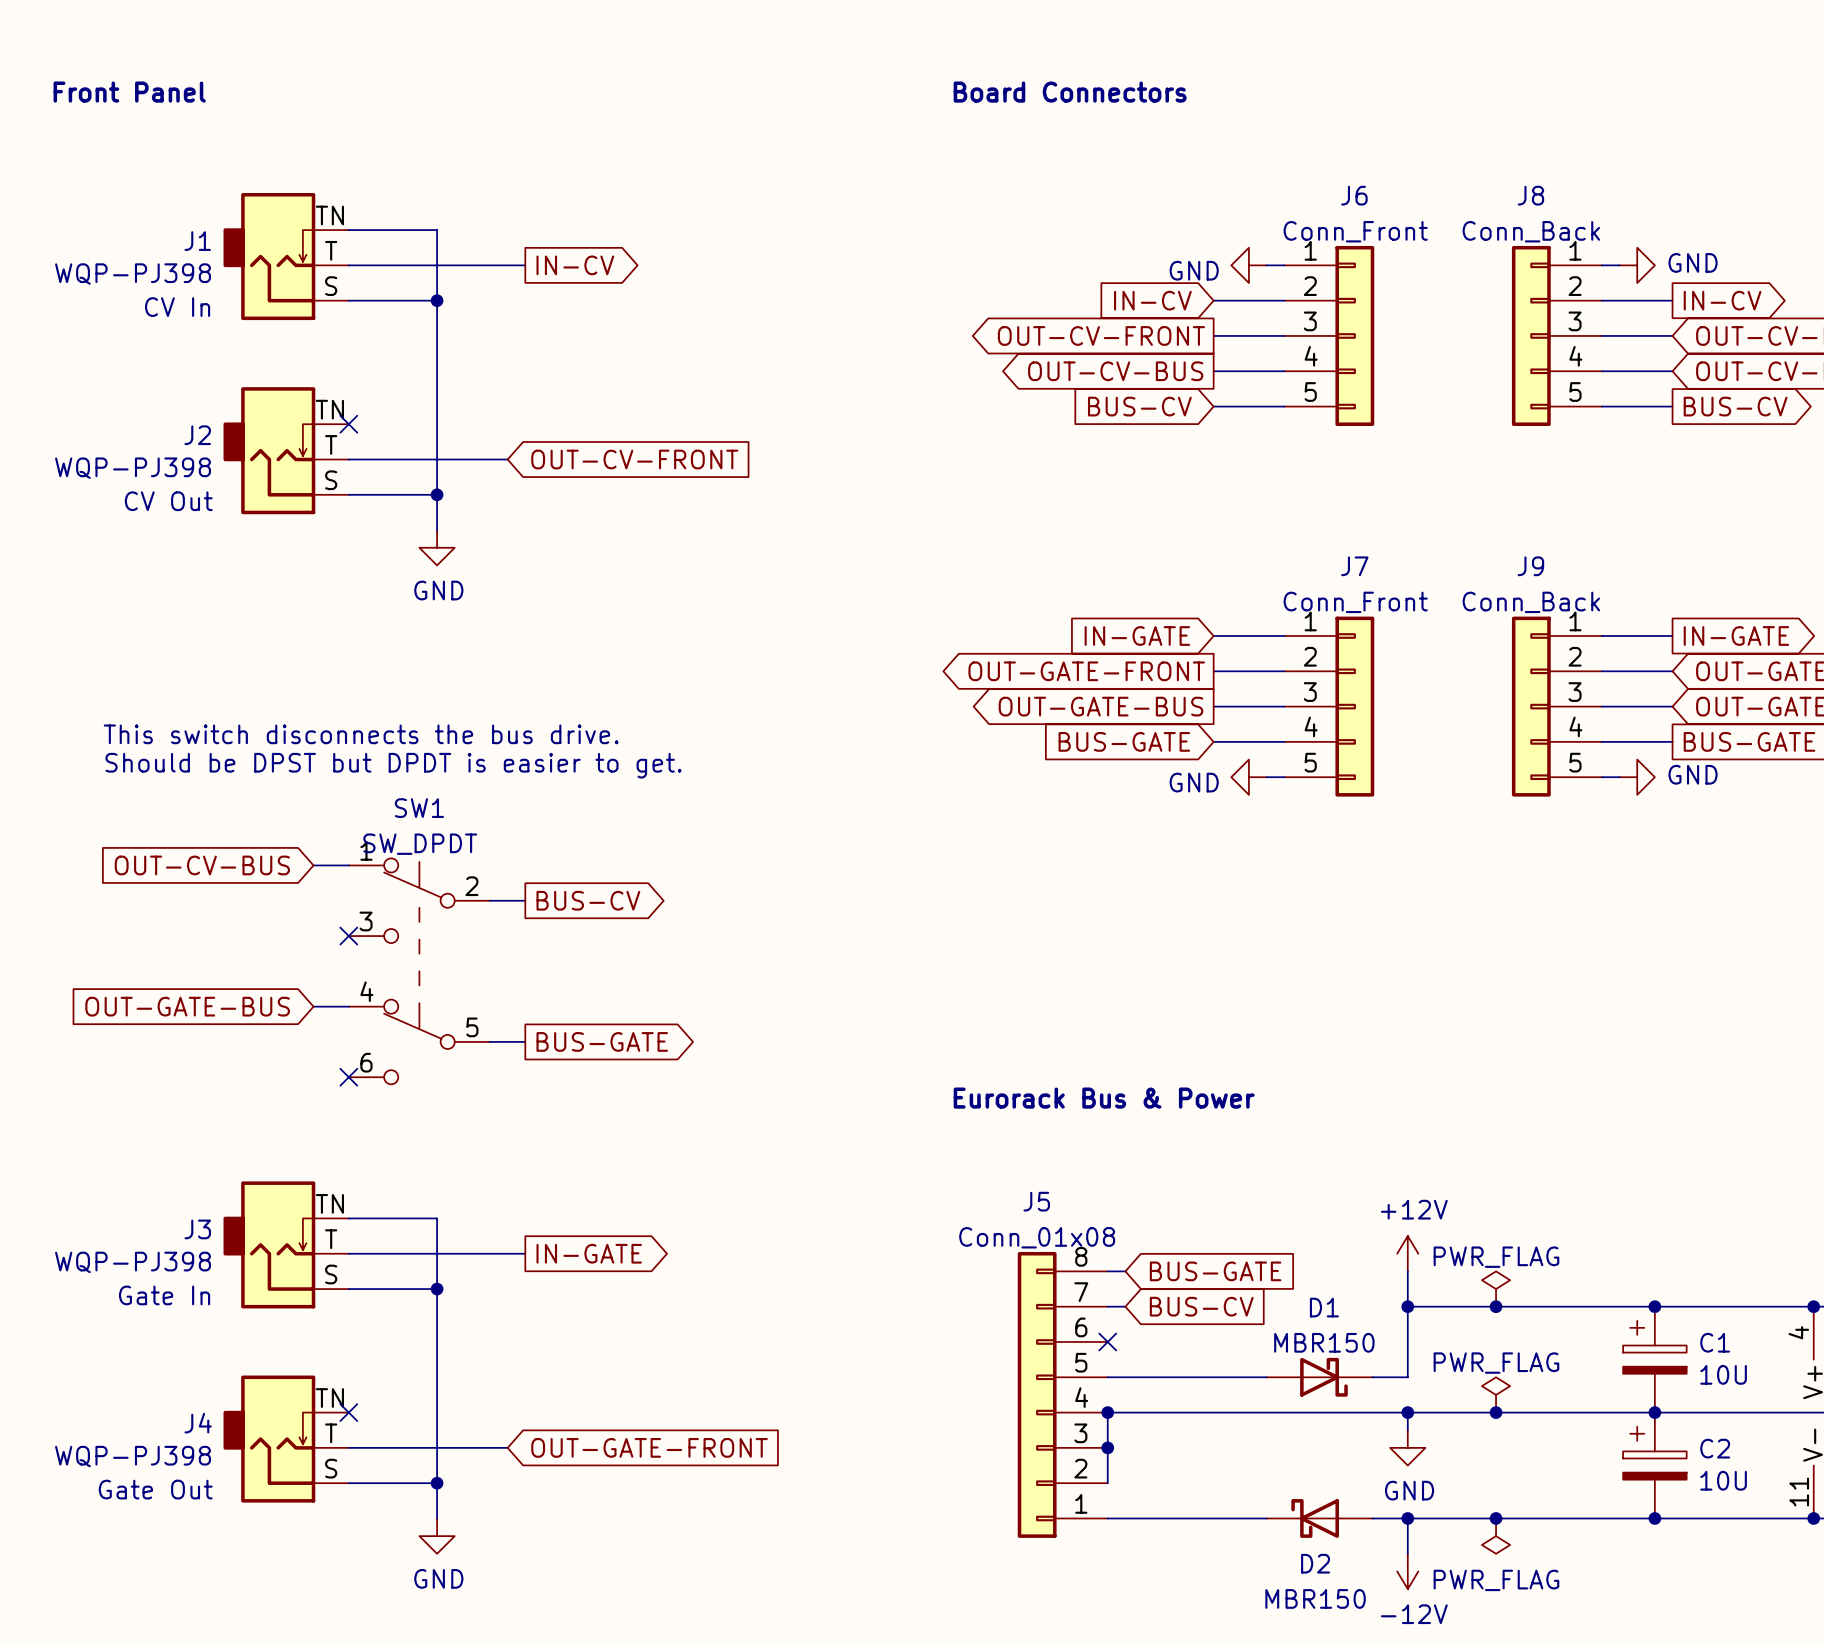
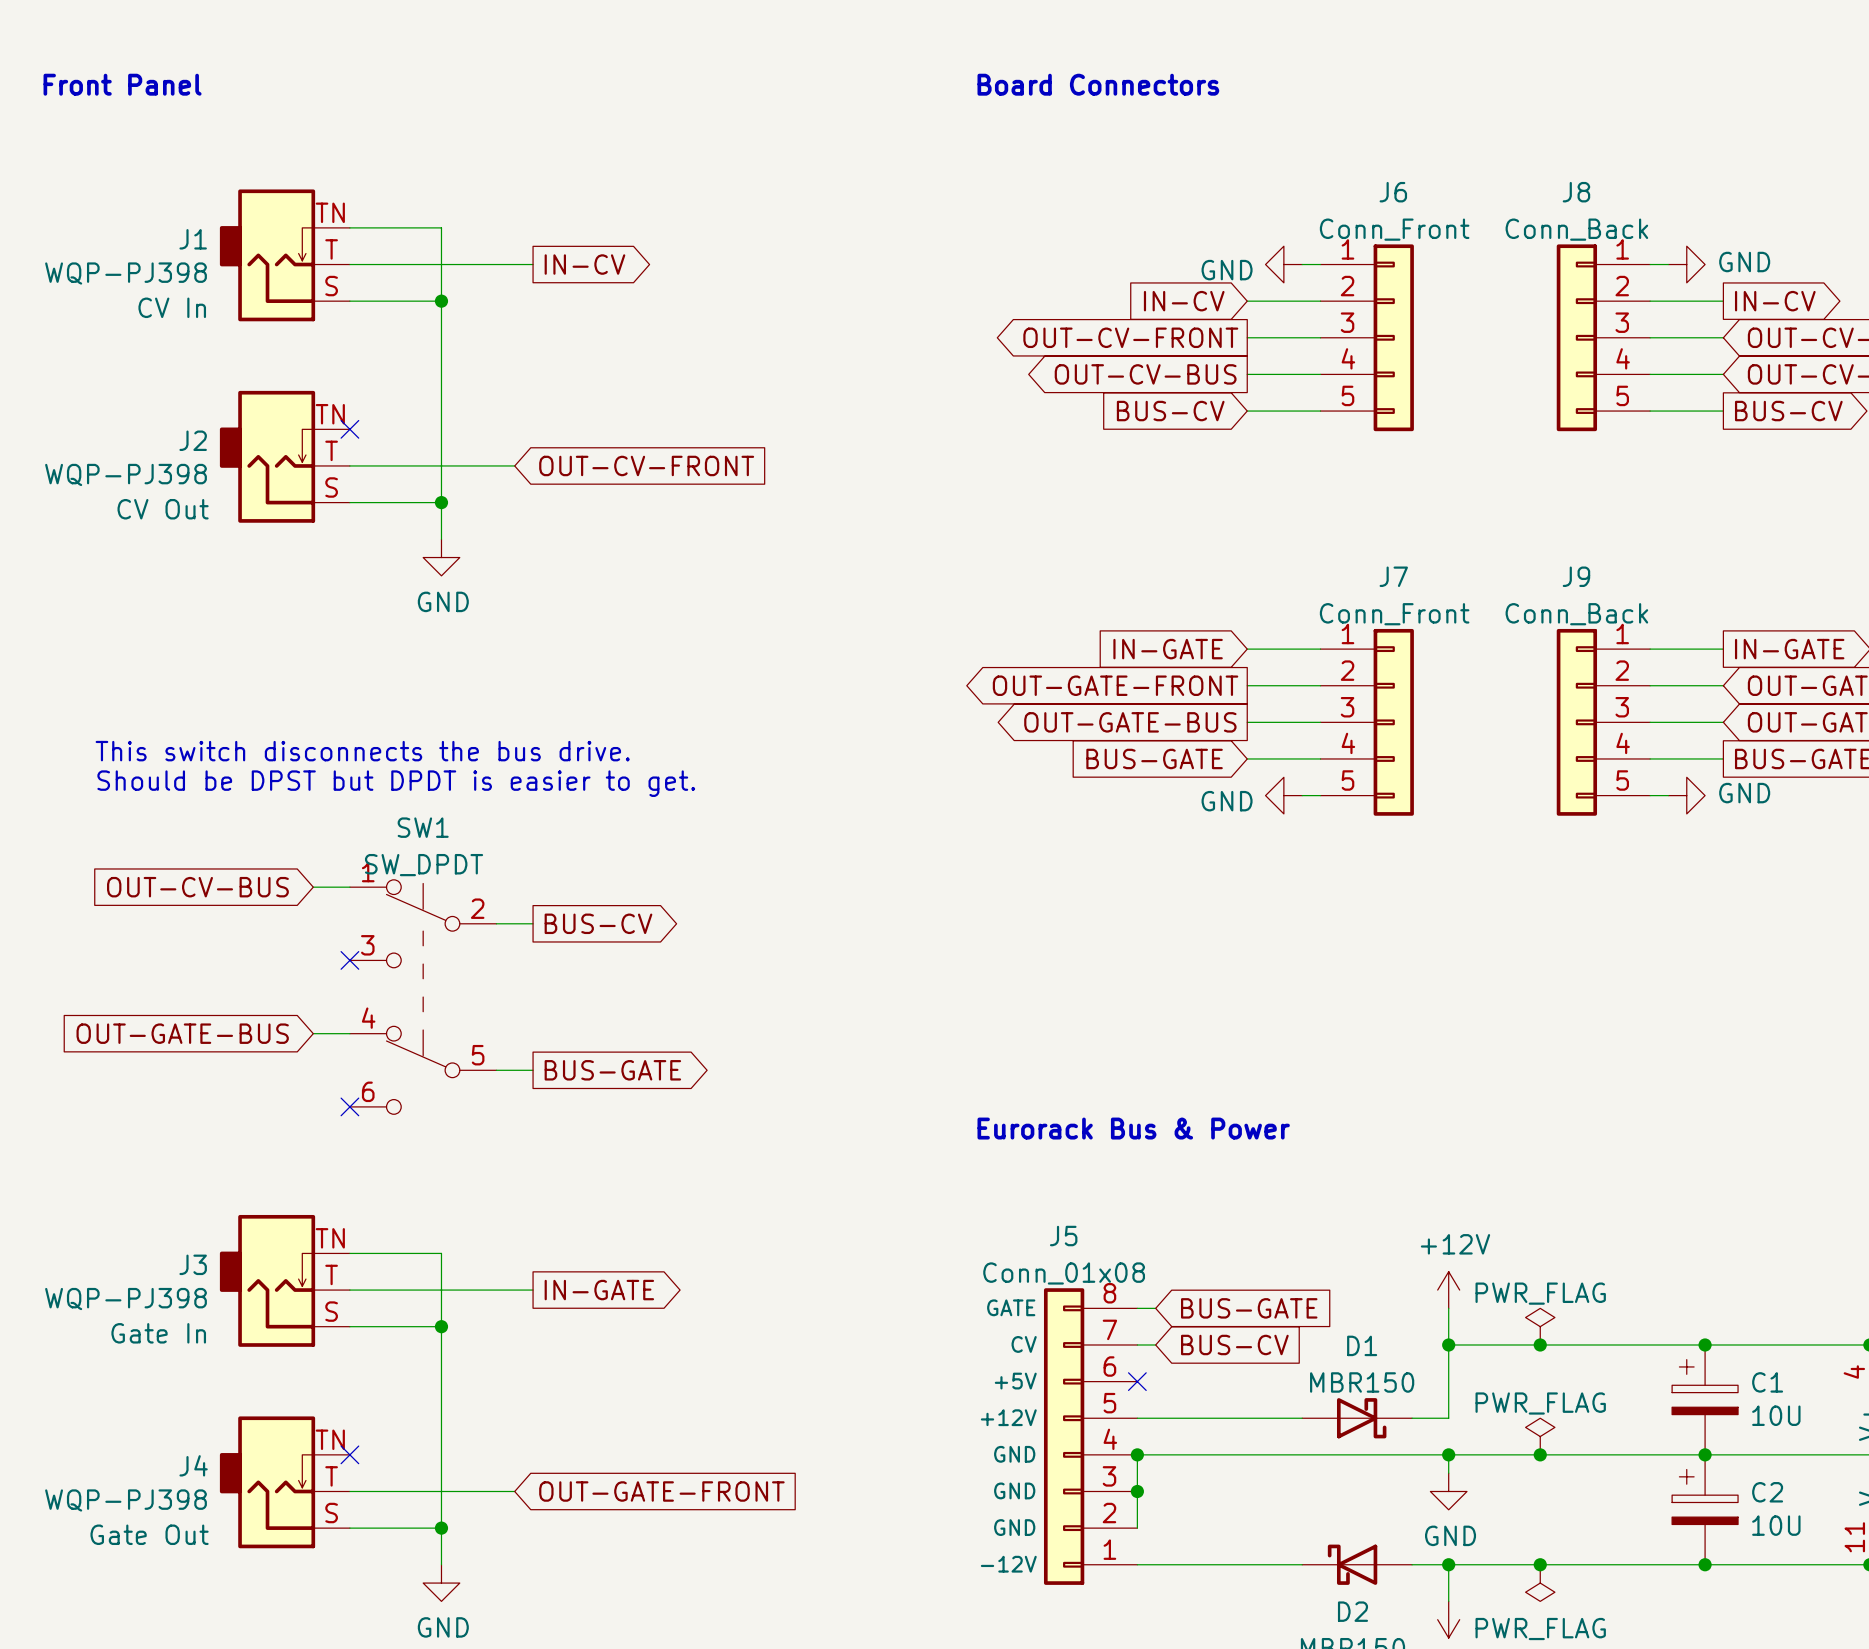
J5 pin name: none -> GATE (1011, 1307)
J5 pin name: none -> CV (1024, 1344)
J5 pin name: none -> +5V (1015, 1381)
J5 pin name: none -> +12V (1008, 1417)
J5 pin name: none -> GND (1014, 1454)
J5 pin name: none -> GND (1014, 1490)
J5 pin name: none -> GND (1014, 1527)
J5 pin name: none -> -12V (1008, 1564)

